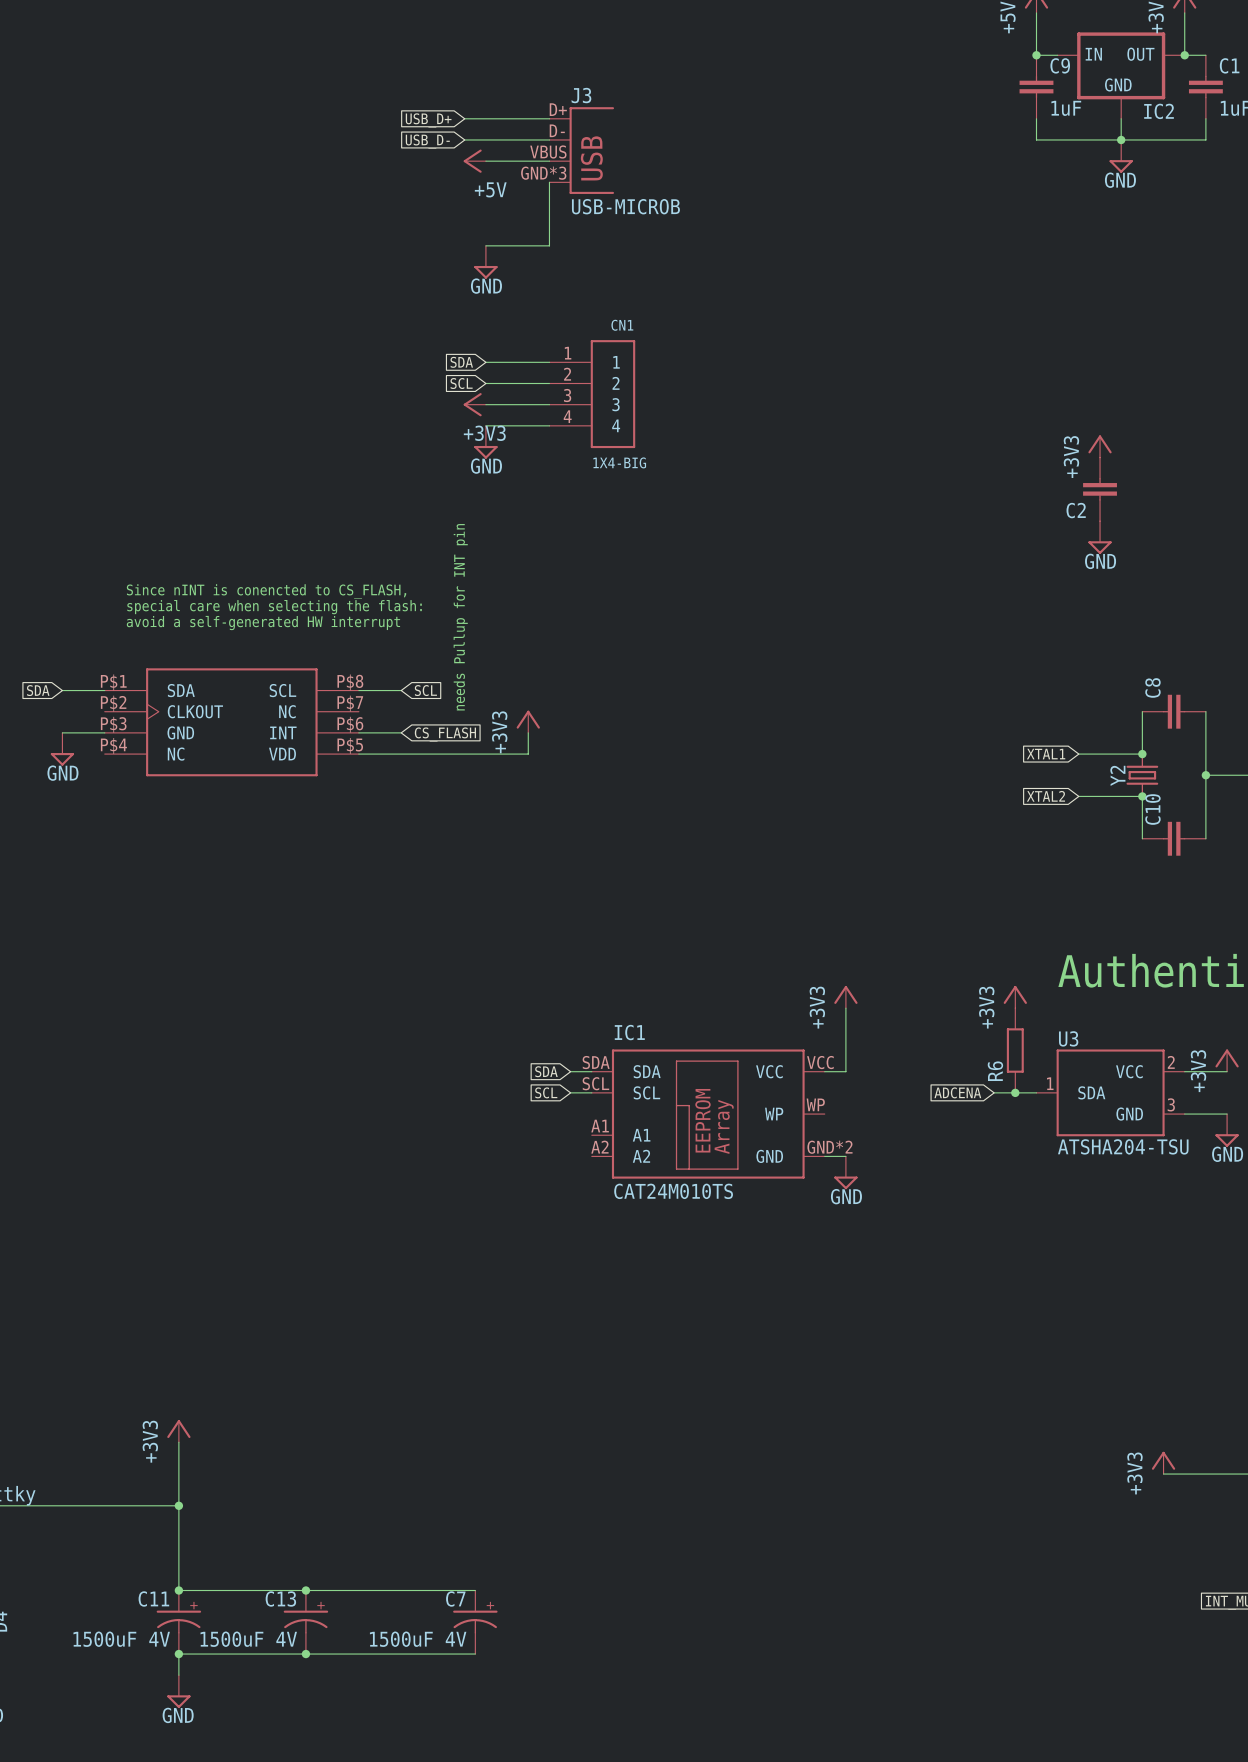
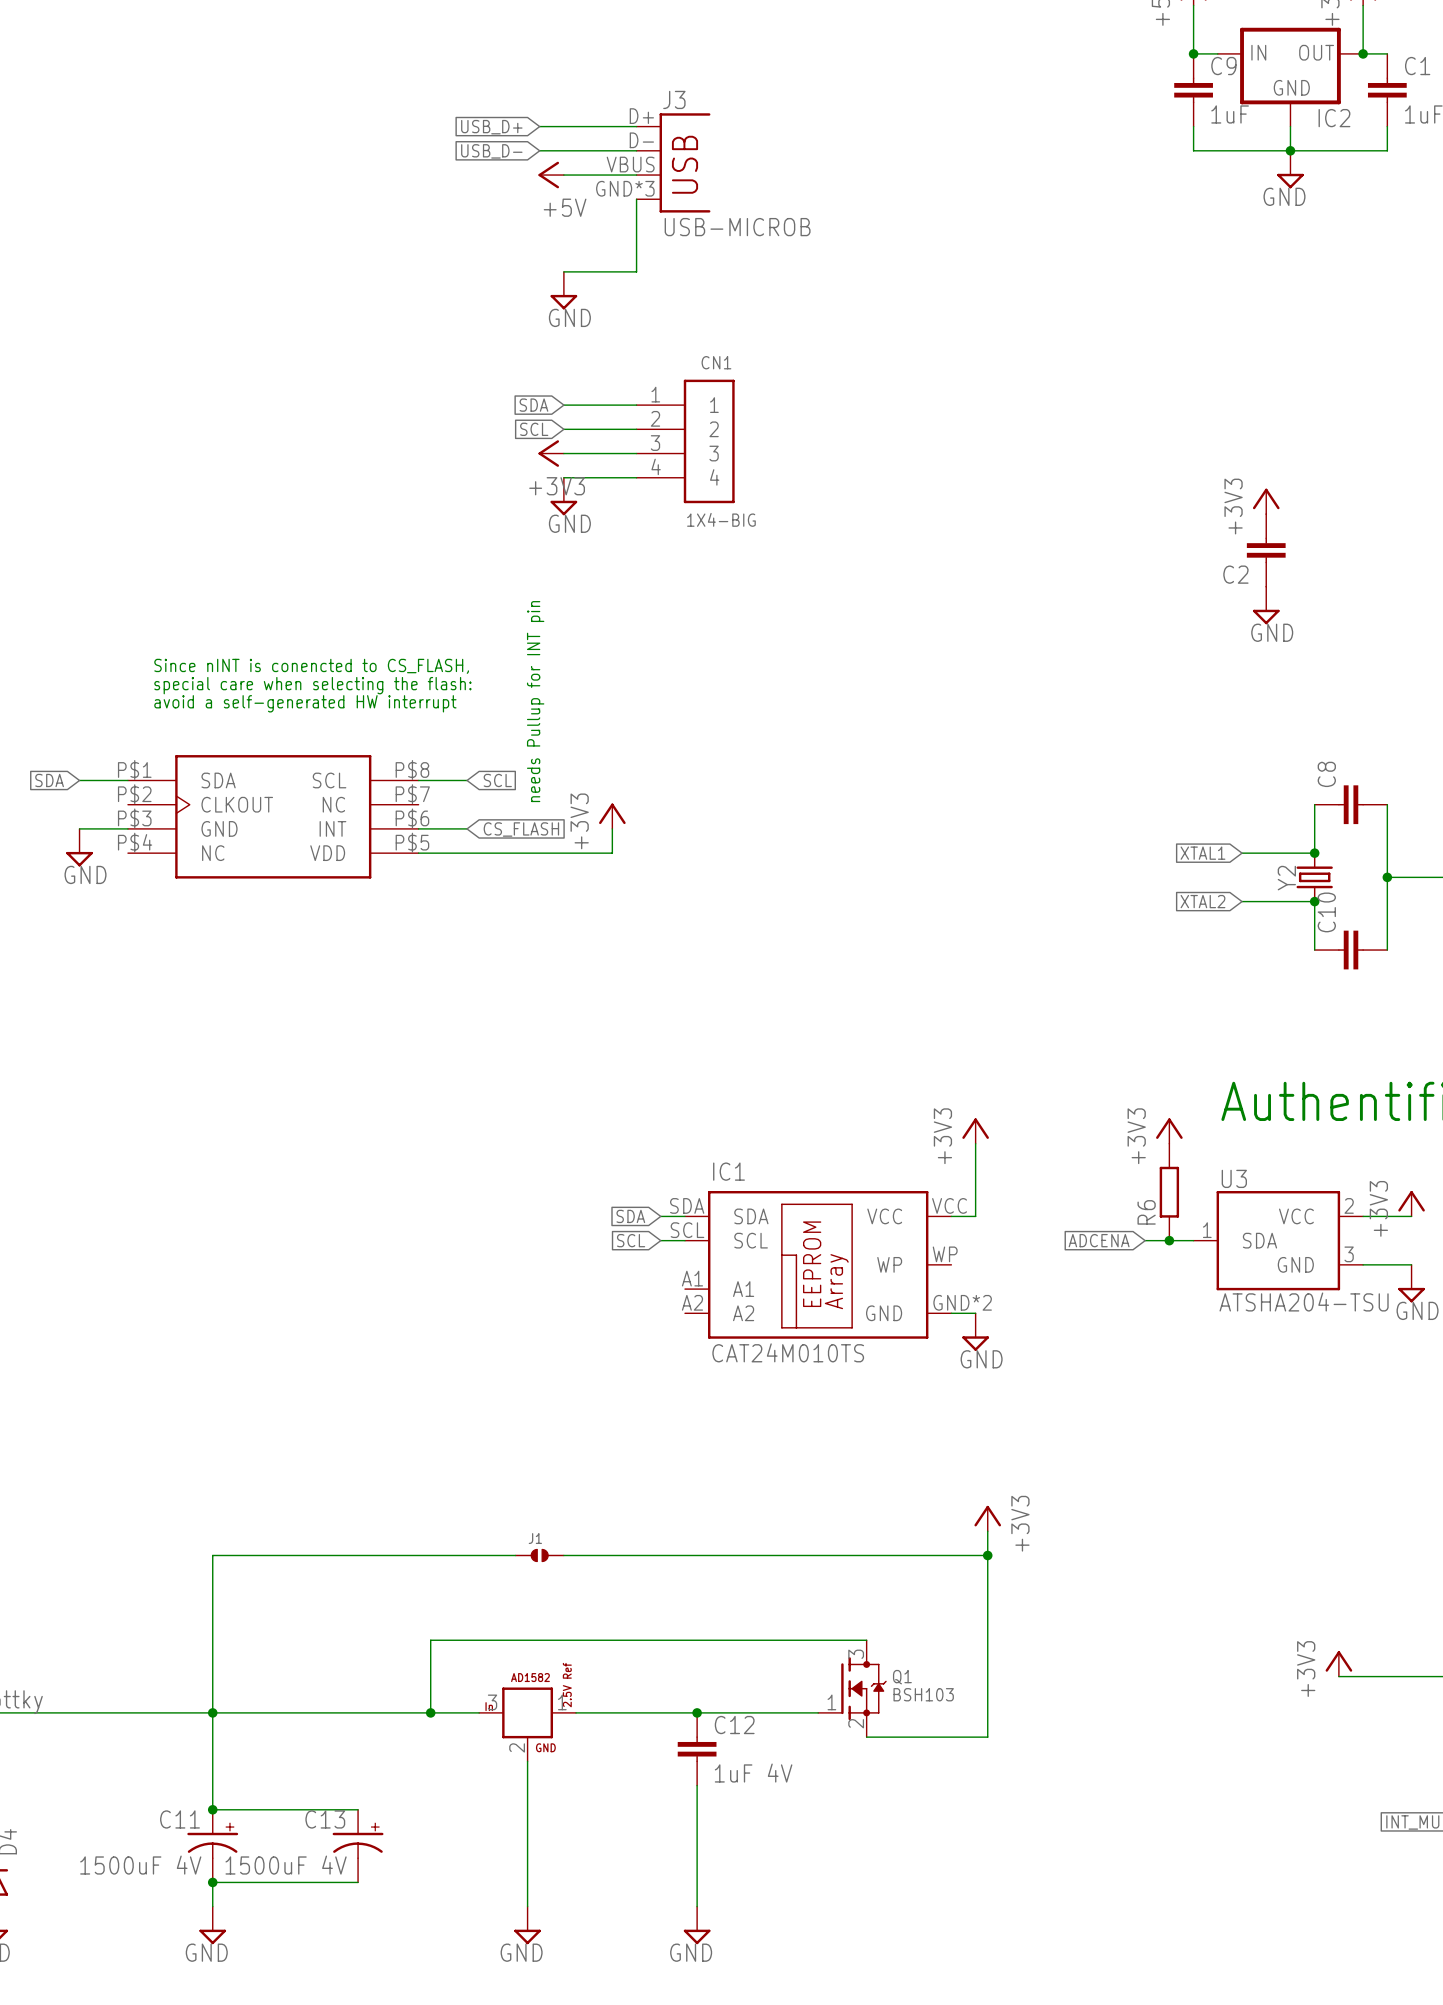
power symbol: none -> +3V3 (987, 1518)
wire: none -> (987, 1531) (987, 1737) (866, 1737)
wire: none -> (515, 1555) (212, 1555) (212, 1640)
J1: none -> (539, 1555)
wire: none -> (563, 1555) (987, 1555)
junction: none -> (987, 1555)
power symbol: +3V3 (178, 1431) -> none
wire: none -> (866, 1640) (430, 1640) (430, 1712)
Q1: none -> BSH103 (852, 1688)
wire: none -> (212, 1712) (479, 1712)
junction: none -> (430, 1712)
wire: none -> (576, 1712) (818, 1712)
junction: none -> (697, 1712)
part: none -> (527, 1724)
C12: none -> 1uF 4V (697, 1749)
wire: none -> (527, 1761) (527, 1906)
wire: none -> (697, 1785) (697, 1906)
wire: (305, 1590) (475, 1590) -> none
junction: (305, 1590) -> none
C7: 1500uF 4V (475, 1622) -> none
wire: (305, 1654) (475, 1654) -> none
junction: (305, 1654) -> none
power symbol: none -> GND (527, 1925)
power symbol: none -> GND (697, 1925)

